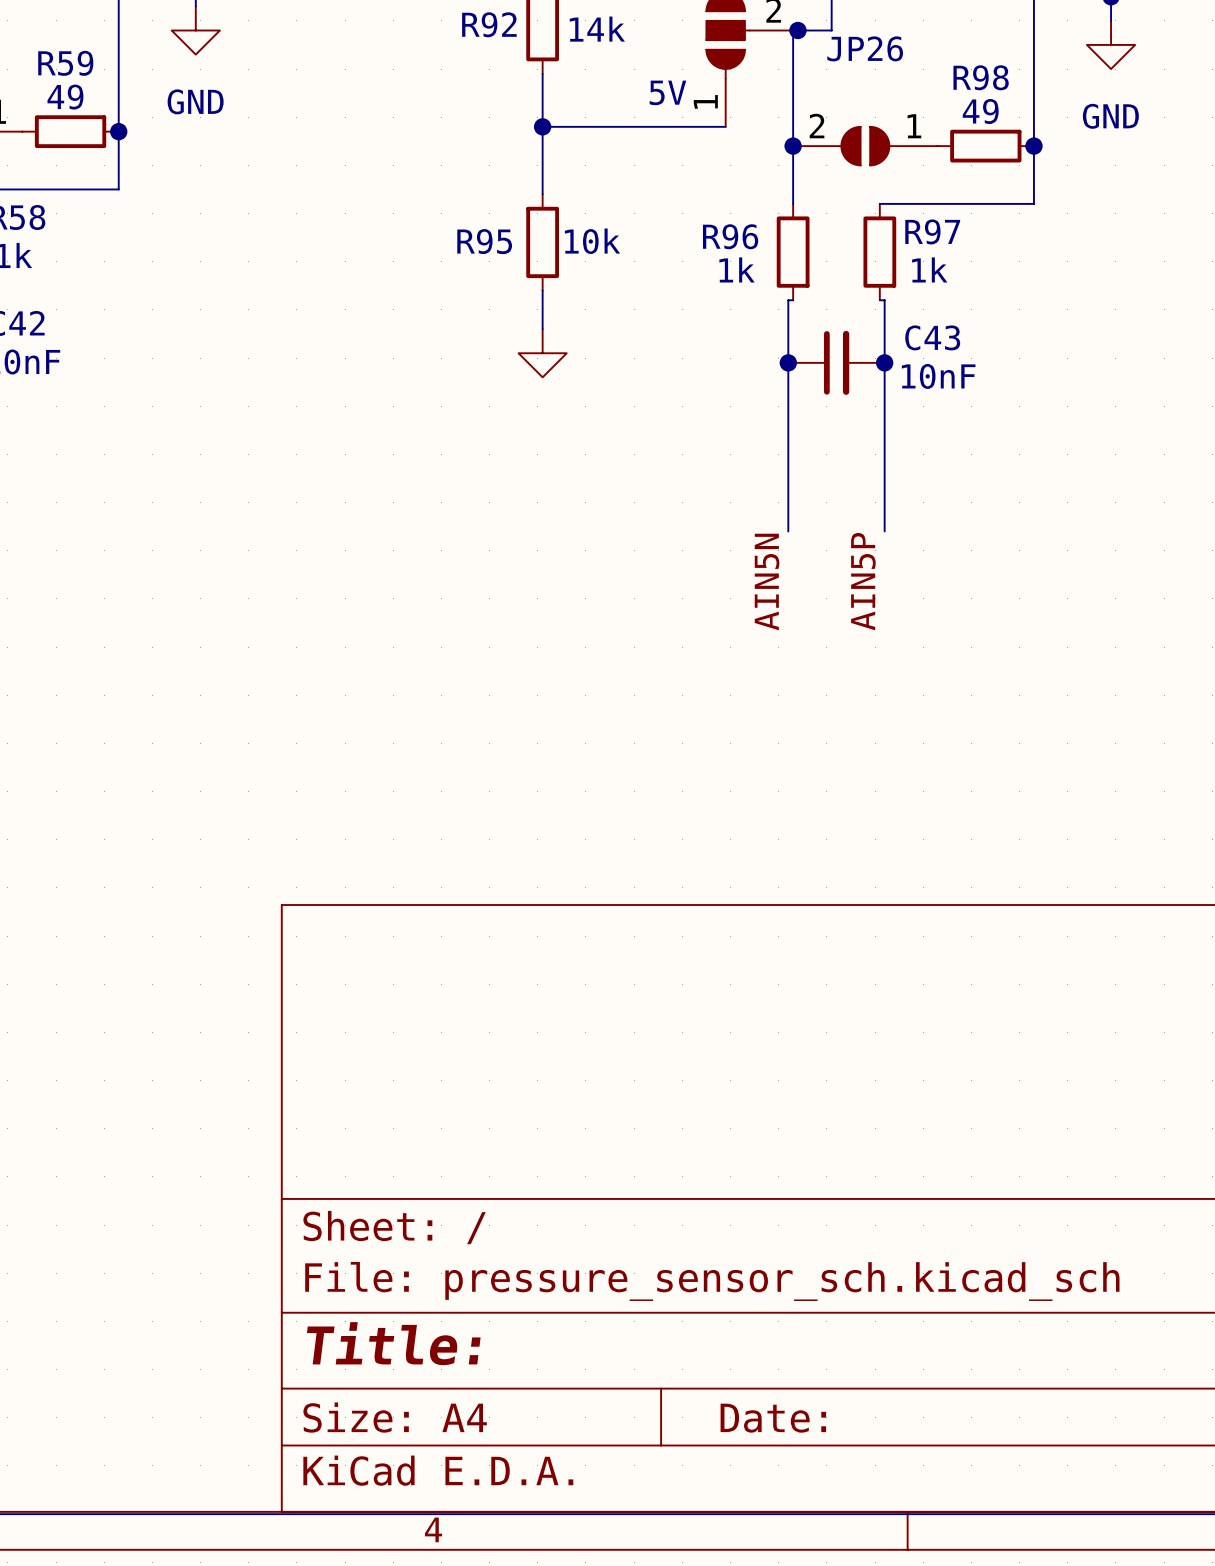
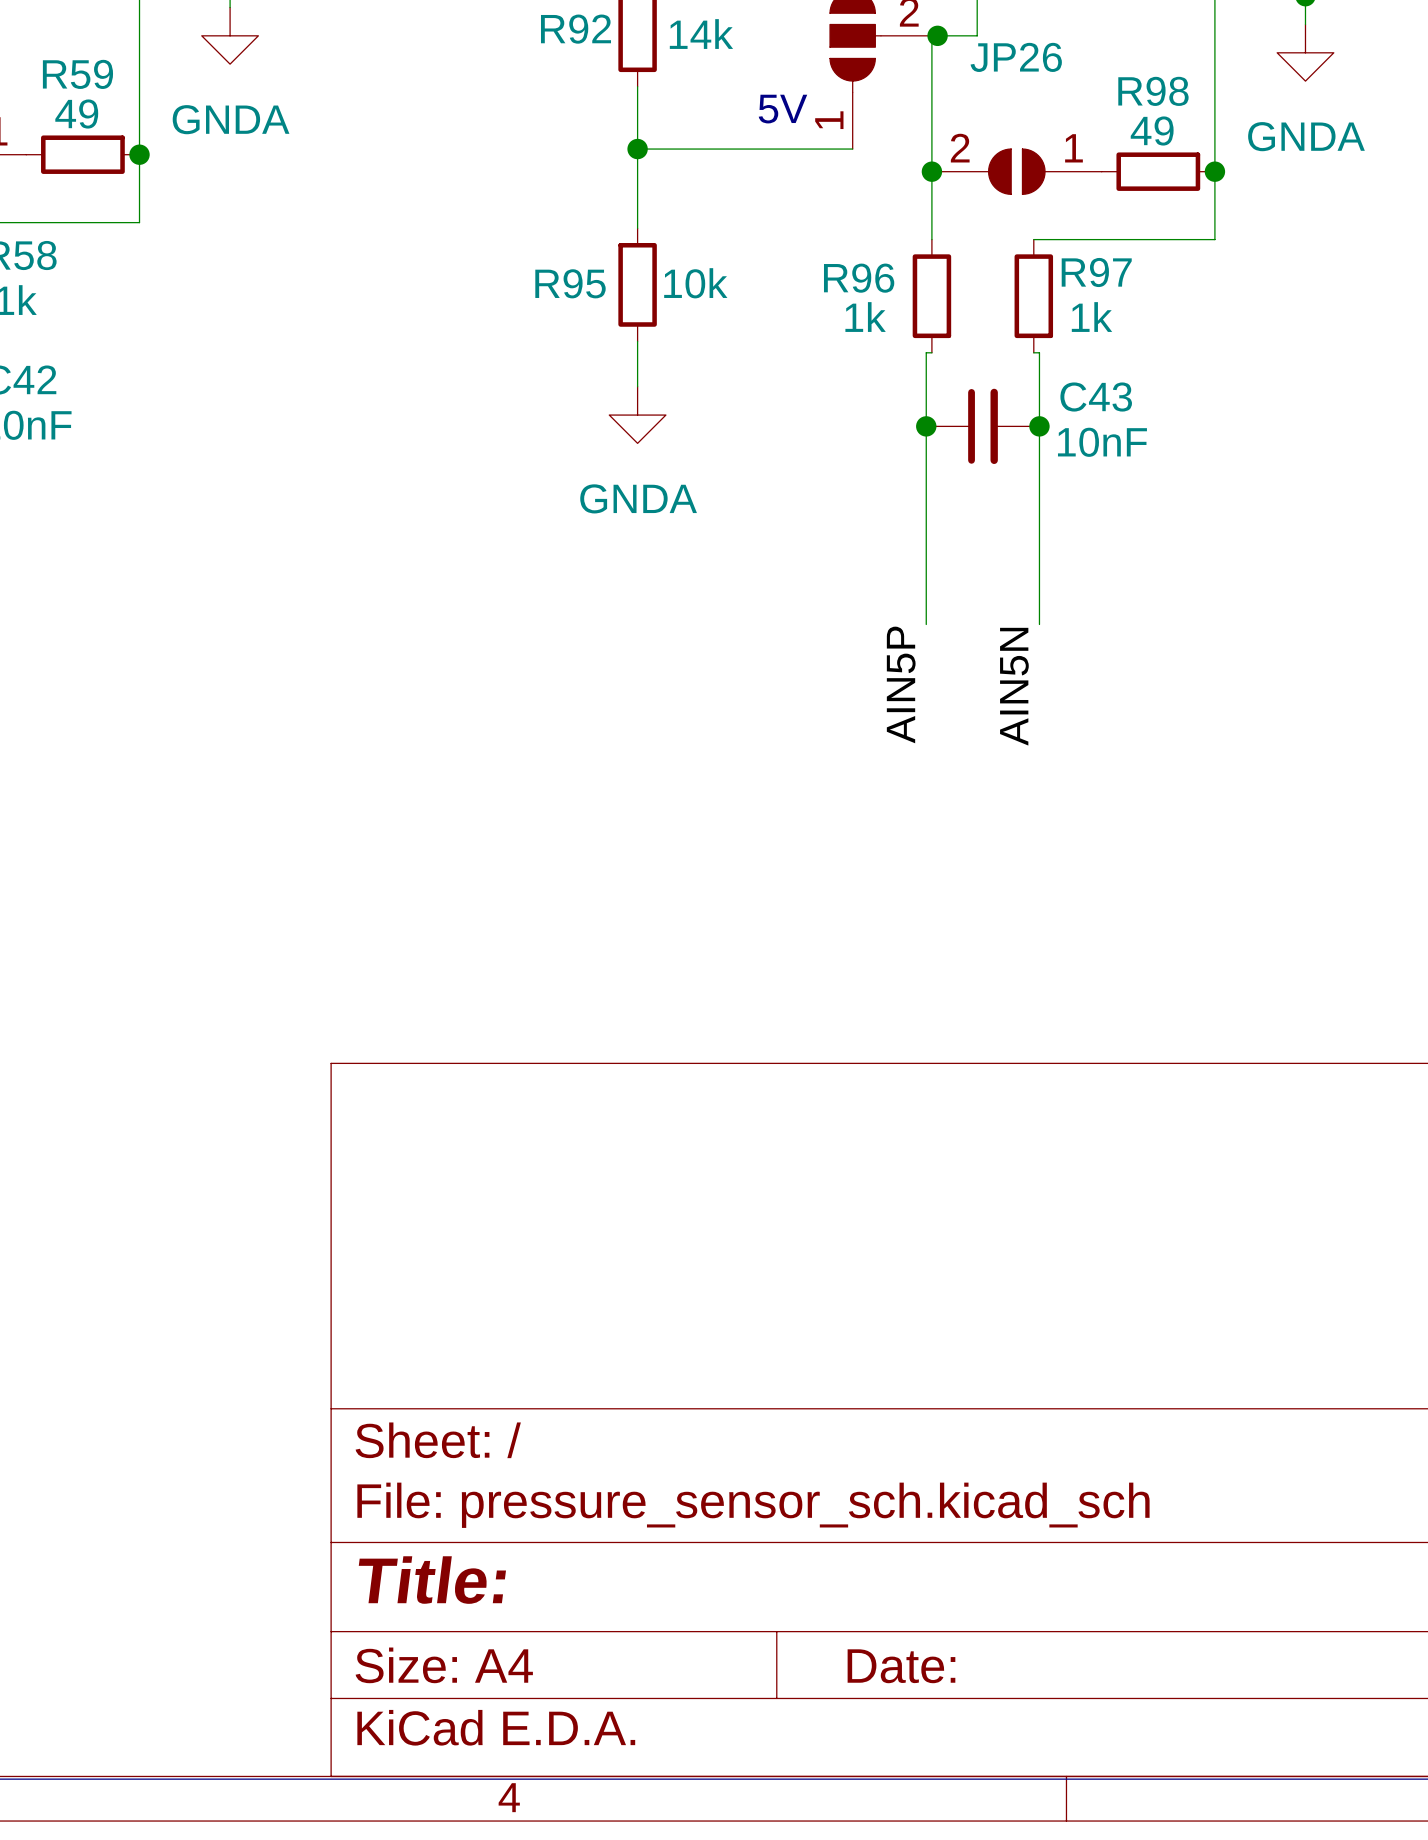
power symbol: GND (195, 30) -> GNDA (230, 35)
power symbol: GND (1111, 44) -> GNDA (1305, 52)
power symbol text: none -> GNDA (638, 498)
label: AIN5P (863, 581) -> AIN5N (1014, 686)
label: AIN5N (767, 582) -> AIN5P (901, 684)

